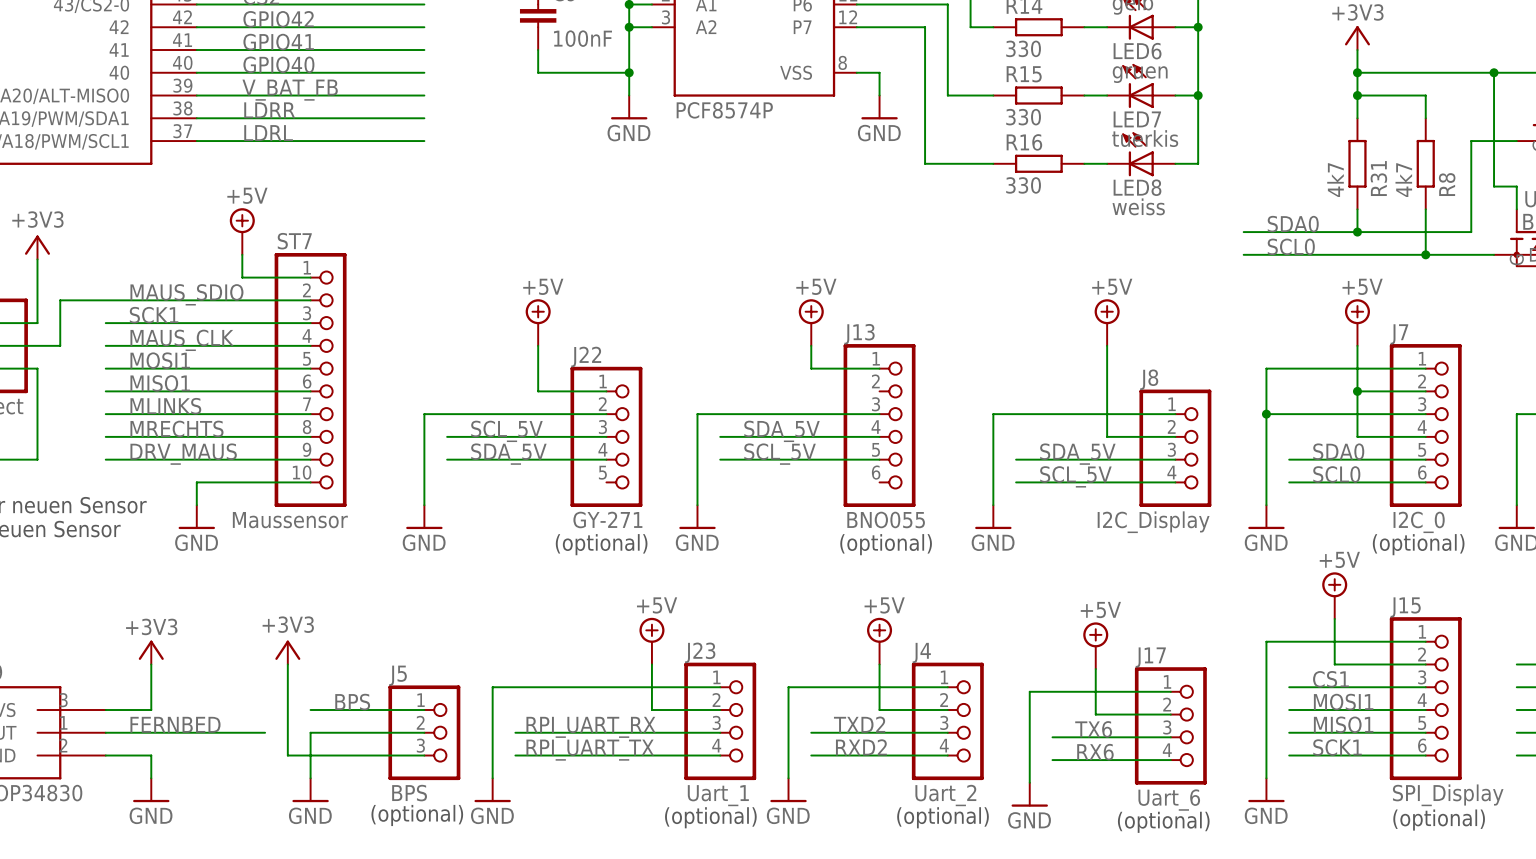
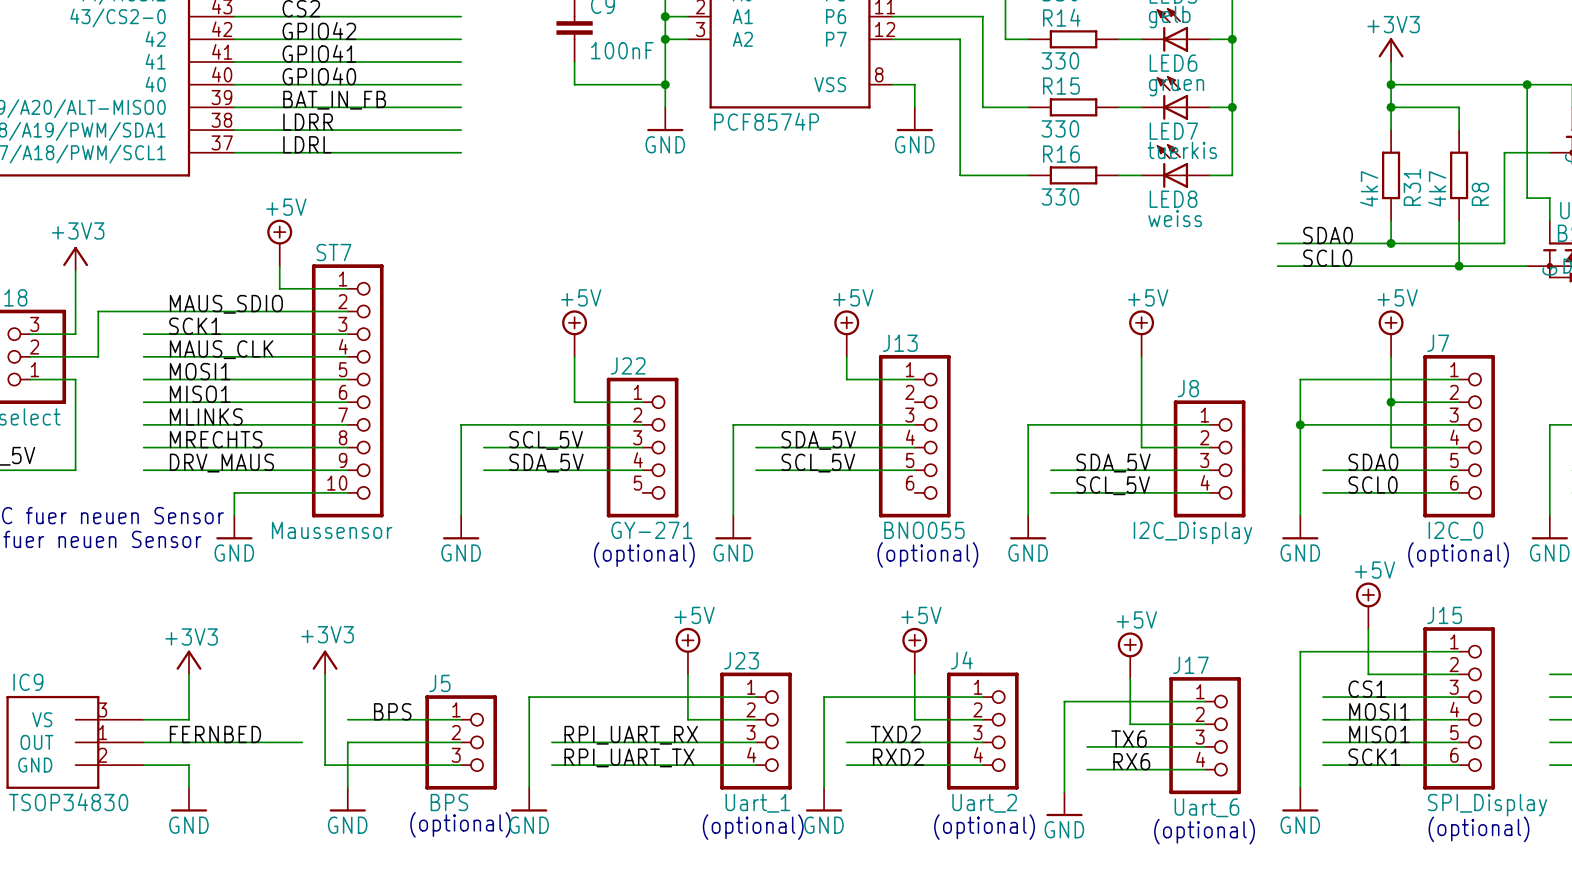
label: V_BAT_FB (290, 90) -> BAT_IN_FB (334, 100)

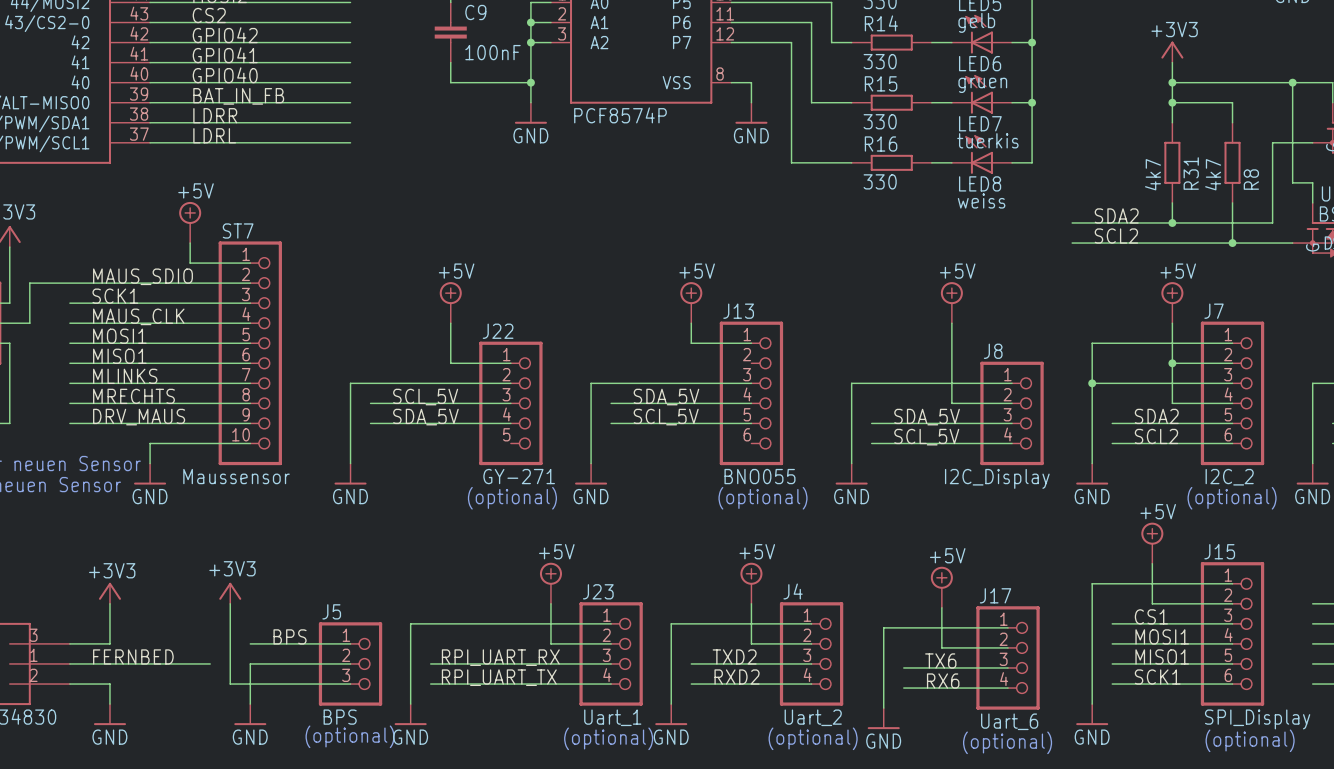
label: SDA0 (1328, 235) -> SDA2 (1116, 215)
label: SCL0 (1327, 258) -> SCL2 (1116, 236)
label: SDA0 (1373, 462) -> SDA2 (1156, 416)
label: SCL0 (1373, 484) -> SCL2 (1156, 436)
J7 value: I2C_0 (1455, 531) -> I2C_2 (1229, 477)

